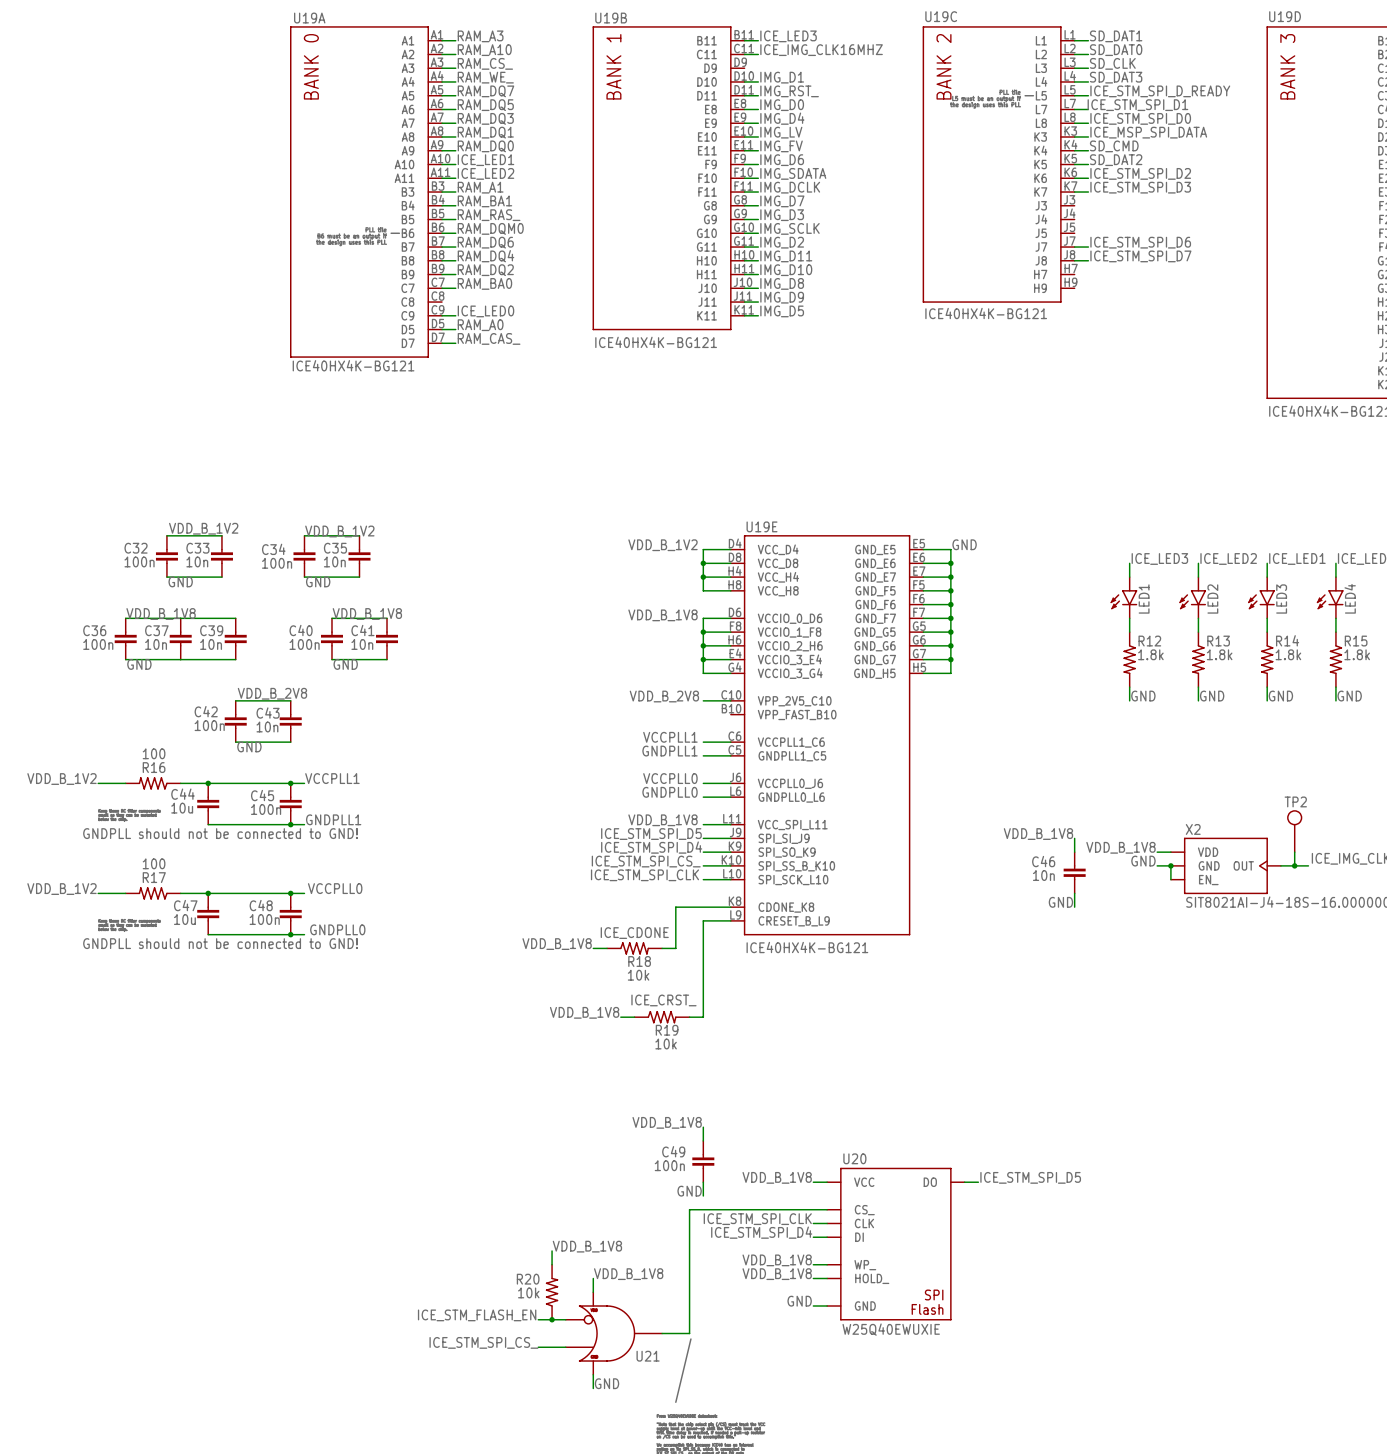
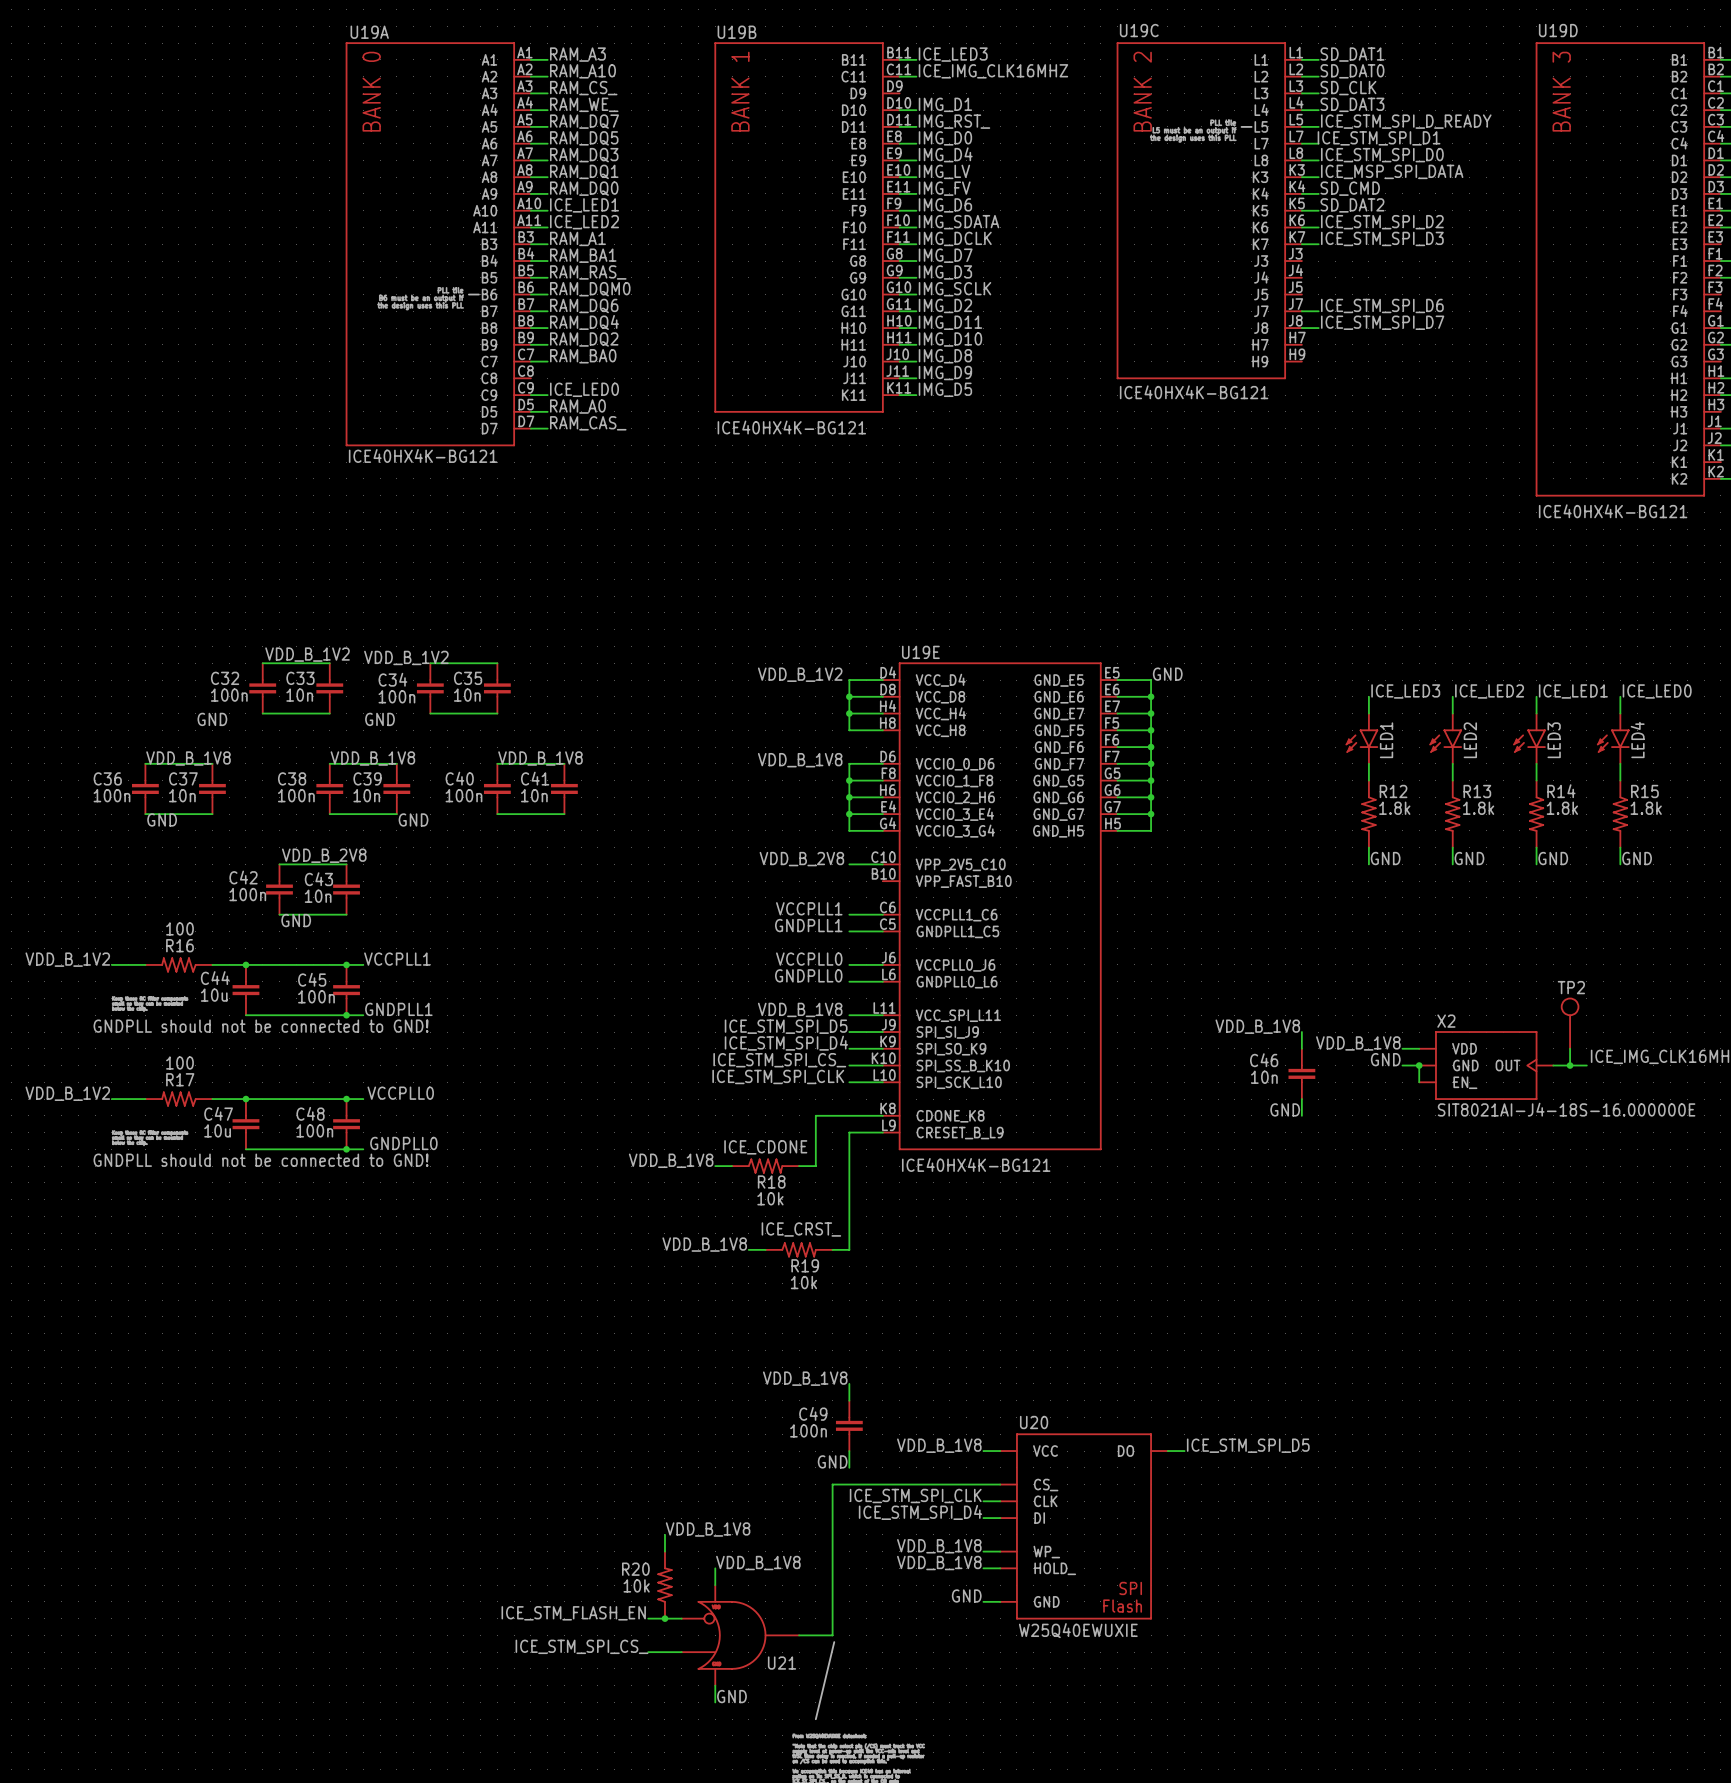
label position: VDD_B_1V2 (203, 528) -> VDD_B_1V2 (307, 654)
wire: (166, 535) (221, 535) -> (329, 663) (262, 663)
wire: (304, 535) (359, 535) -> (497, 663) (430, 663)
C33 name: C33 (197, 548) -> C32 (225, 678)
C35 name: C35 (335, 548) -> C34 (392, 679)
C32: 100n (166, 556) -> none
C33: none -> 10n (329, 688)
C34: 100n (304, 556) -> none
C35: none -> 10n (497, 688)
C33 value: 10n (197, 561) -> 100n (229, 695)
C35 value: 10n (334, 561) -> 100n (396, 696)
wire: (166, 577) (221, 577) -> (329, 713) (262, 713)
wire: (304, 577) (359, 577) -> (497, 713) (430, 713)
label position: VDD_B_1V8 (367, 613) -> VDD_B_1V8 (372, 758)
label: none -> VDD_B_1V8 (540, 758)
wire: (180, 618) (235, 618) -> none
wire: (331, 618) (387, 618) -> (396, 763) (329, 763)
wire: none -> (497, 763) (564, 763)
C40 name: C40 (301, 630) -> C39 (367, 778)
C39: 10n (235, 638) -> none
C38: none -> 100n (329, 788)
C41 position: (387, 638) -> (564, 788)
C40: none -> 100n (497, 788)
C40 value: 100n (304, 644) -> 10n (366, 795)
wire: (180, 659) (235, 659) -> none
wire: (331, 659) (387, 659) -> (396, 814) (329, 814)
wire: none -> (497, 814) (564, 814)

